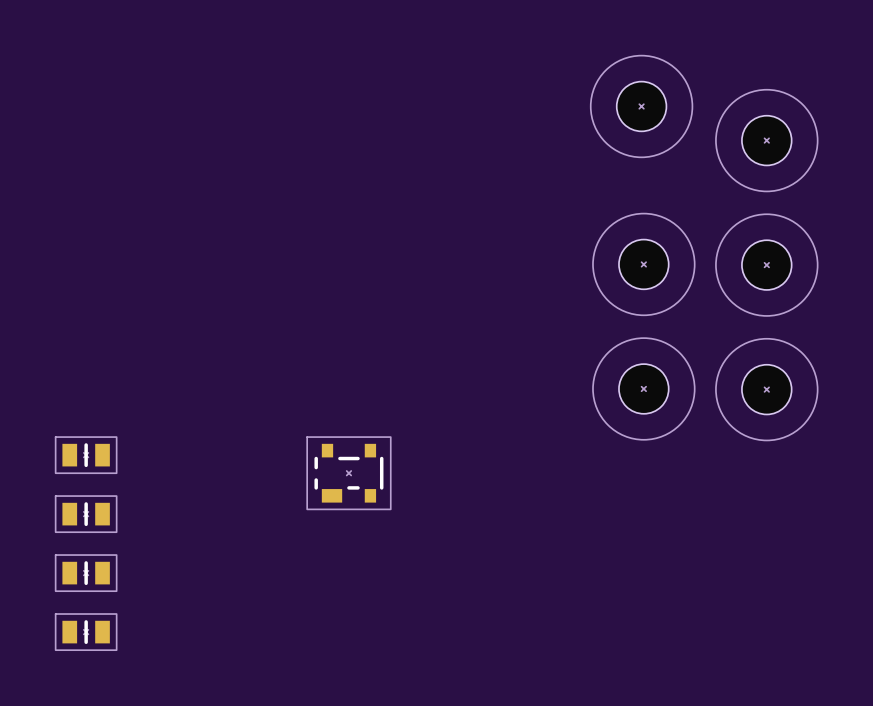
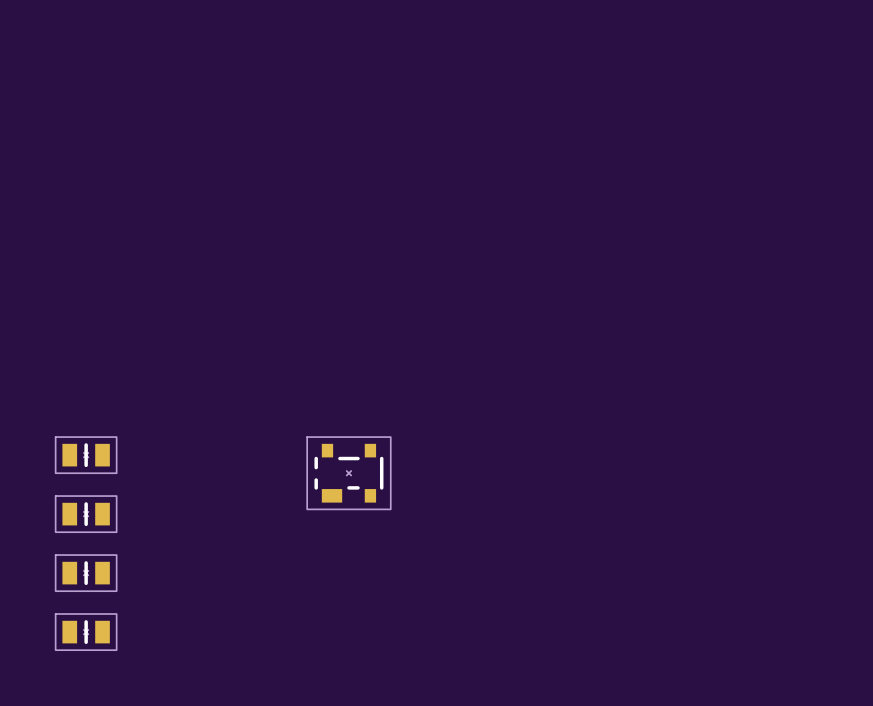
part: (641, 106) -> none
part: (766, 140) -> none
part: (643, 264) -> none
part: (766, 265) -> none
part: (643, 388) -> none
part: (766, 389) -> none

